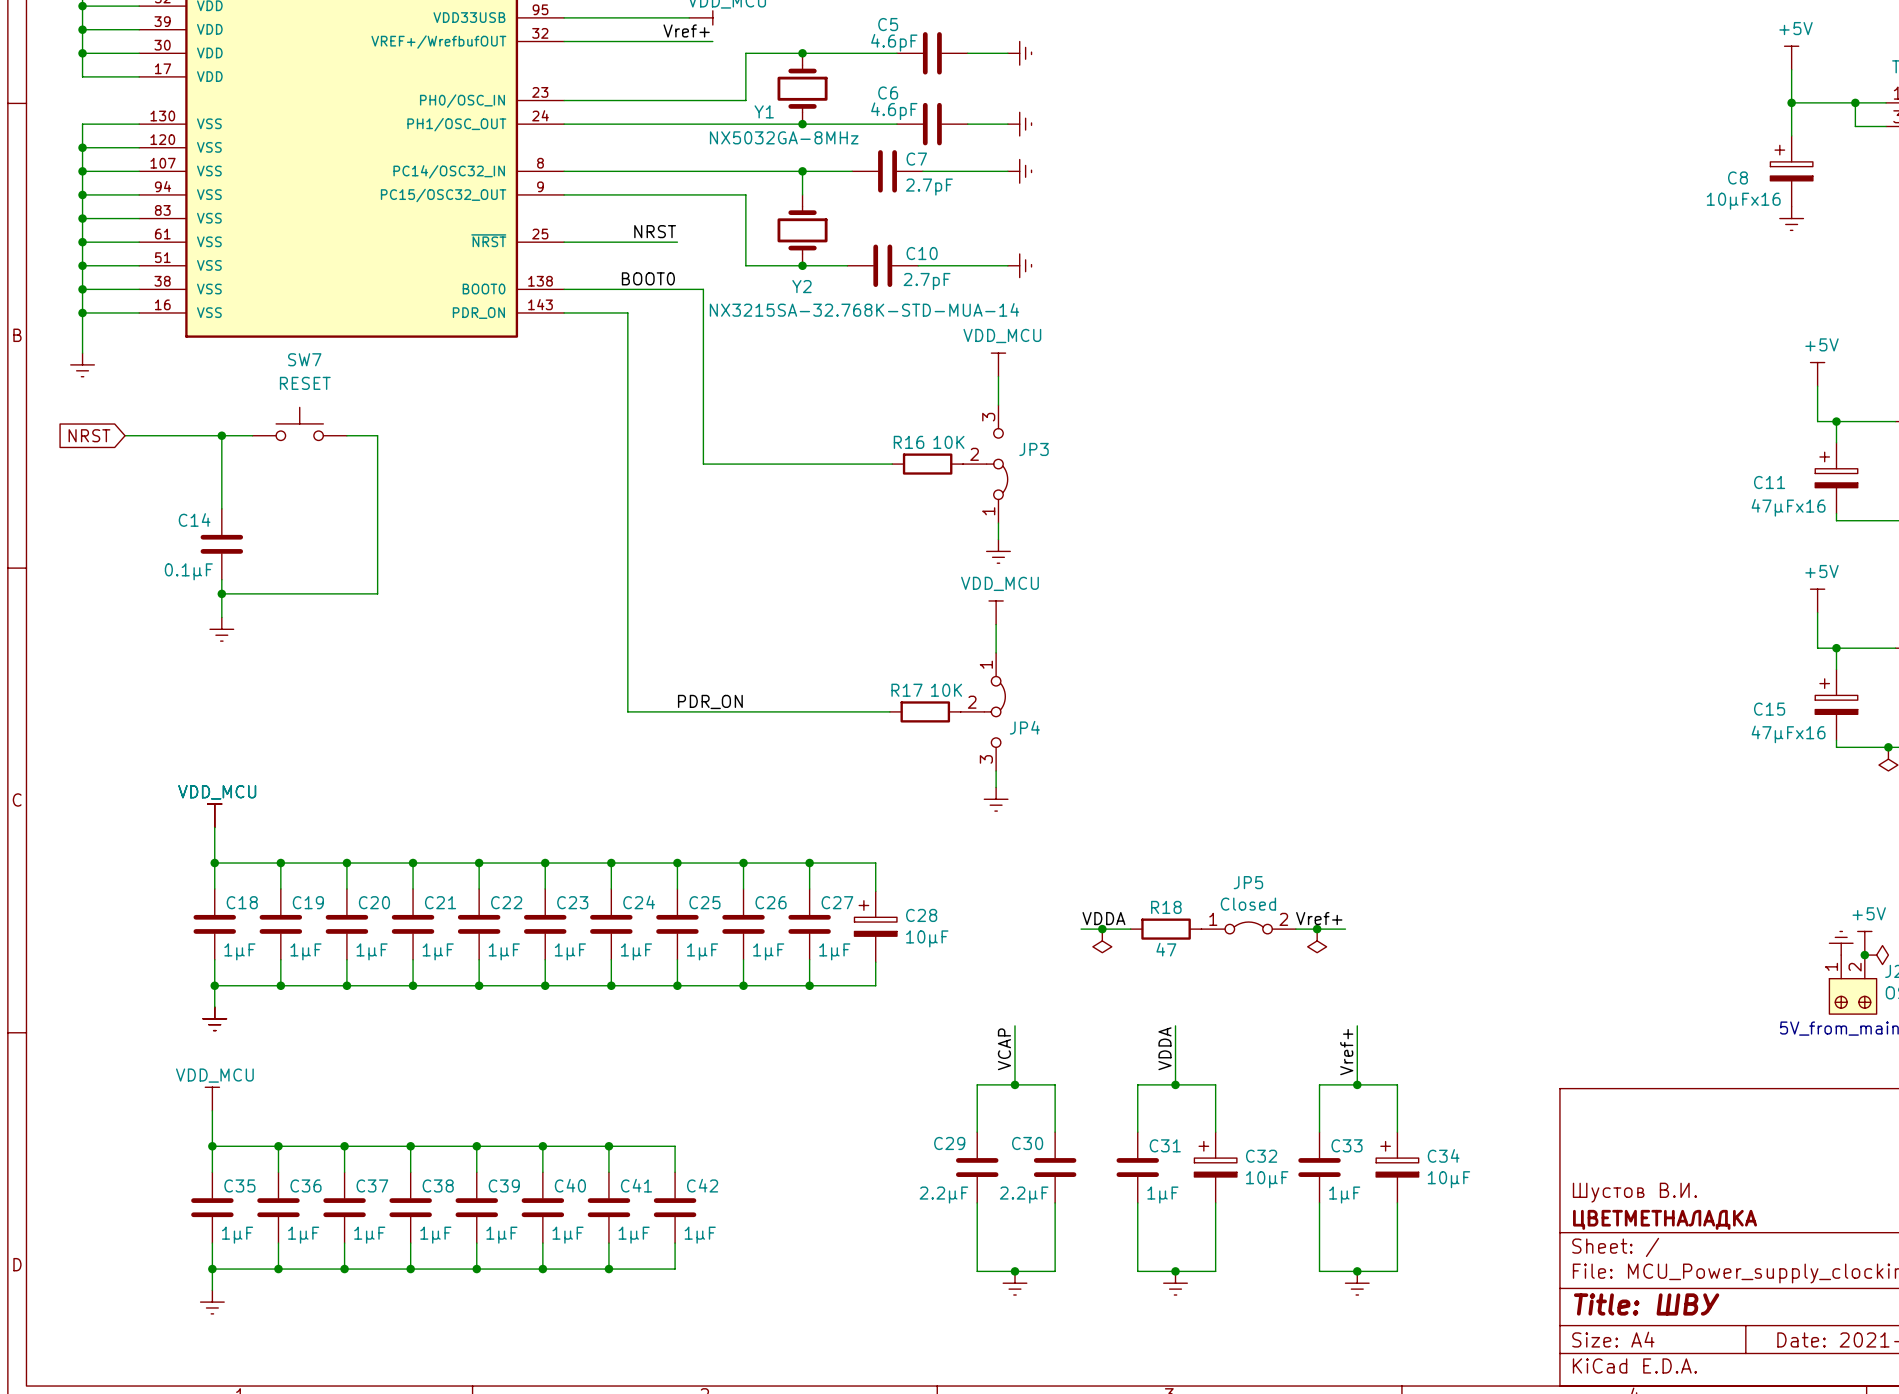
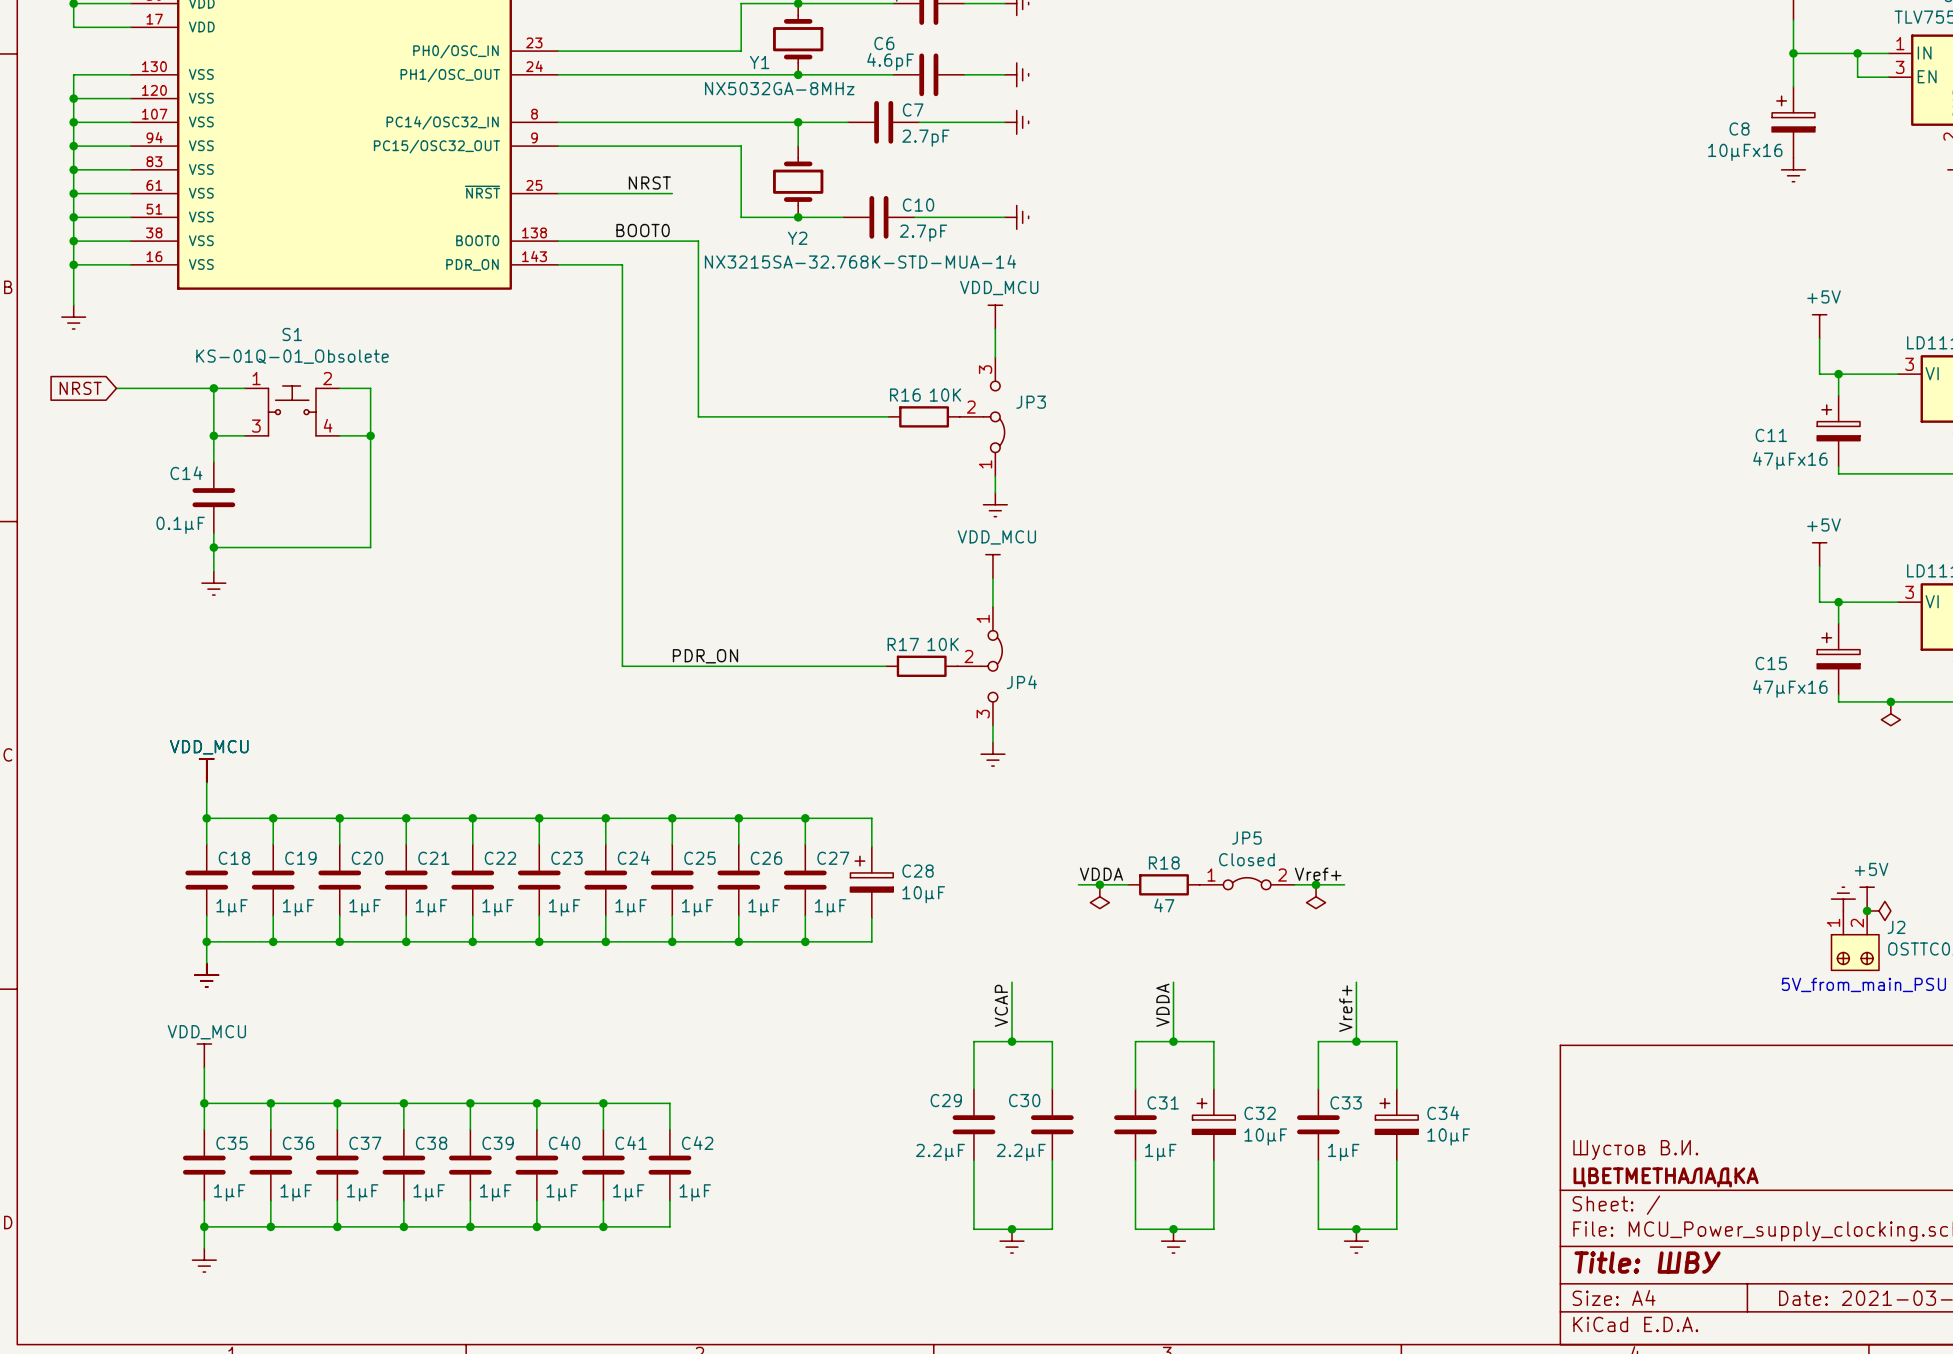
SW7: RESET (299, 423) -> none
S1: none -> KS-01Q-01_Obsolete (292, 410)
wire: none -> (213, 435) (244, 435)
junction: none -> (213, 435)
wire: none -> (339, 435) (370, 435)
junction: none -> (370, 435)

